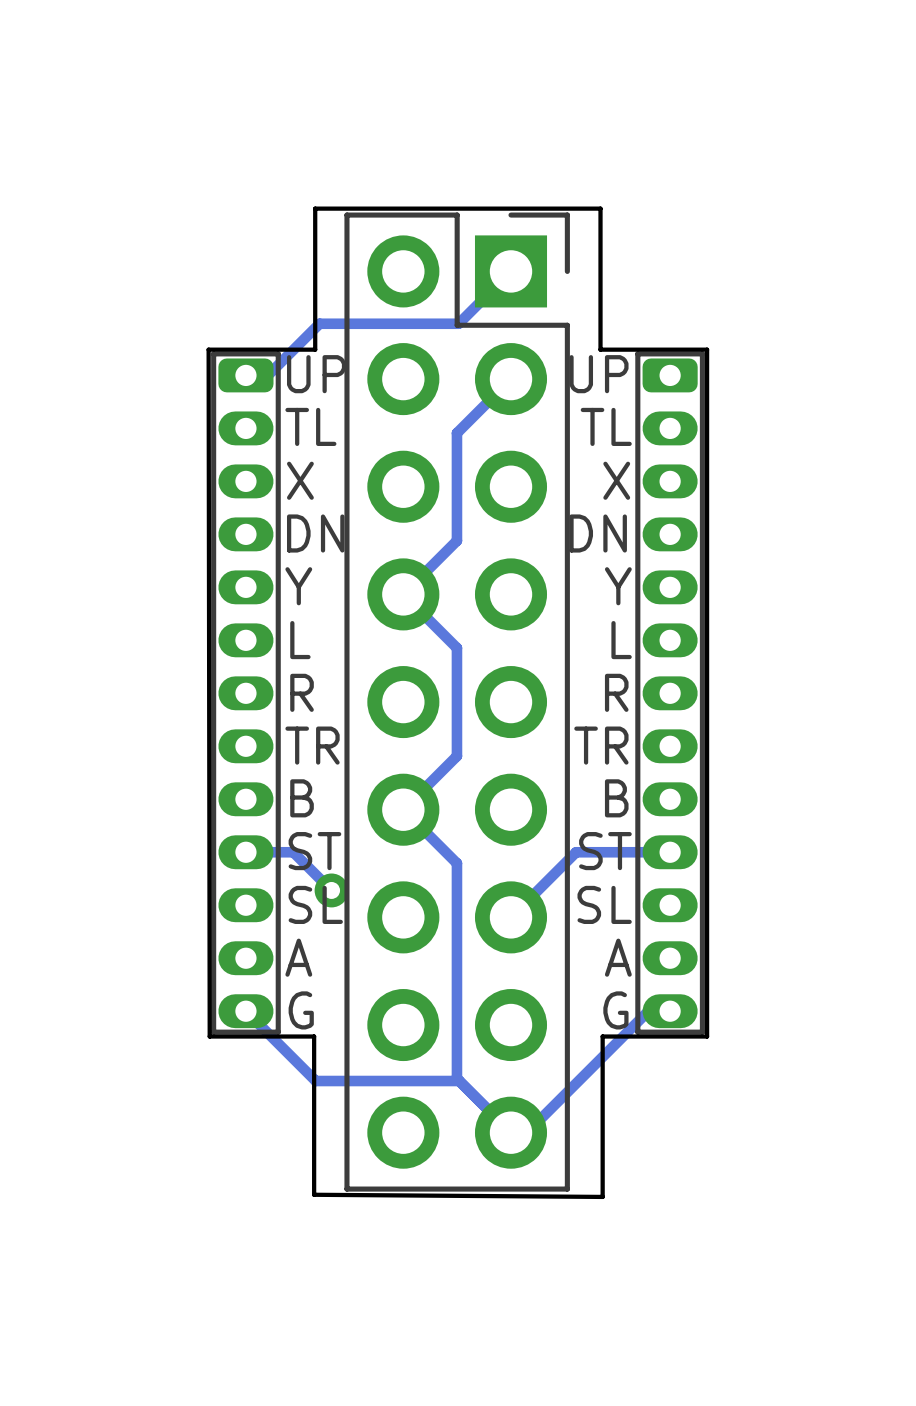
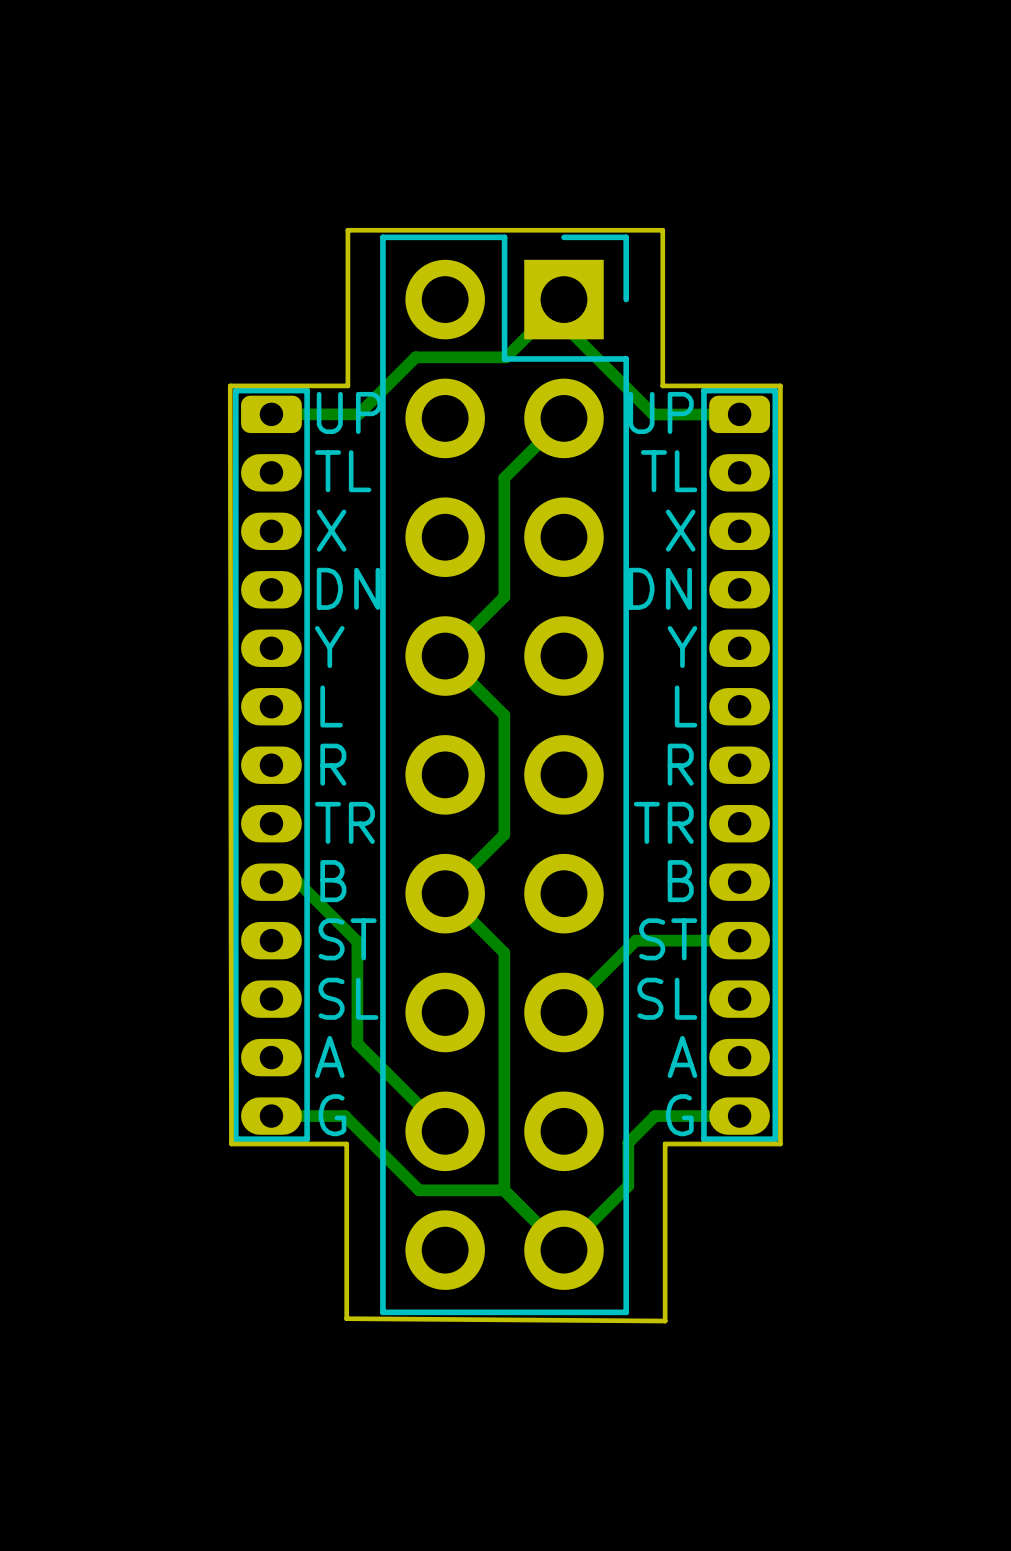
track: none -> (563, 299) (563, 325) (653, 414) (739, 414)
track: (376, 323) (319, 323) (267, 375) -> (415, 357) (358, 414) (295, 414)
track: none -> (271, 882) (297, 882) (357, 941) (357, 1043) (445, 1131)
track: (245, 852) (293, 852) (331, 890) -> none
via: (331, 890) -> none
track: (245, 1011) (315, 1081) (459, 1081) -> (271, 1116) (344, 1116) (419, 1190) (504, 1190)
track: (648, 1011) (526, 1132) (511, 1132) -> (715, 1116) (655, 1116) (628, 1142) (628, 1185) (563, 1250)

